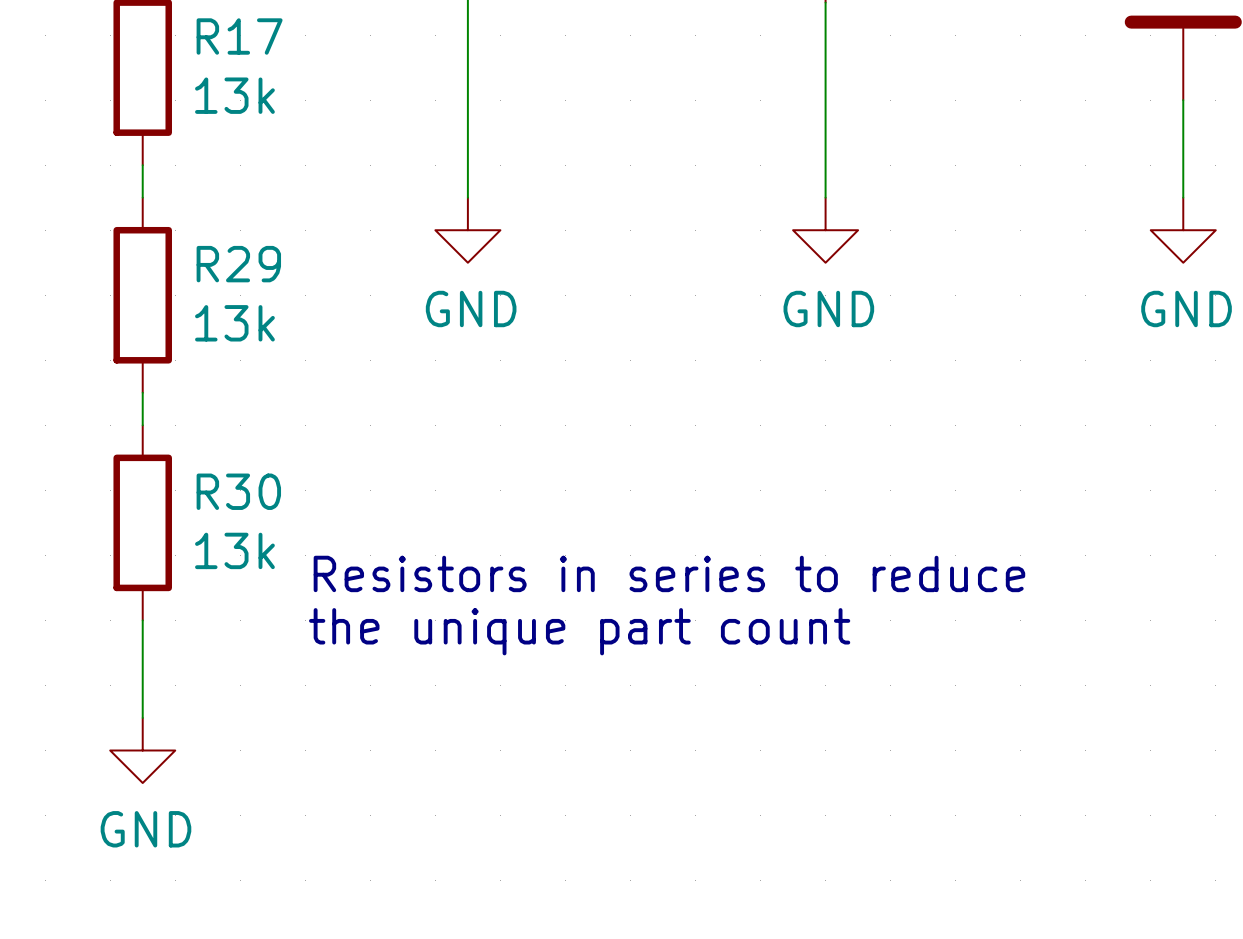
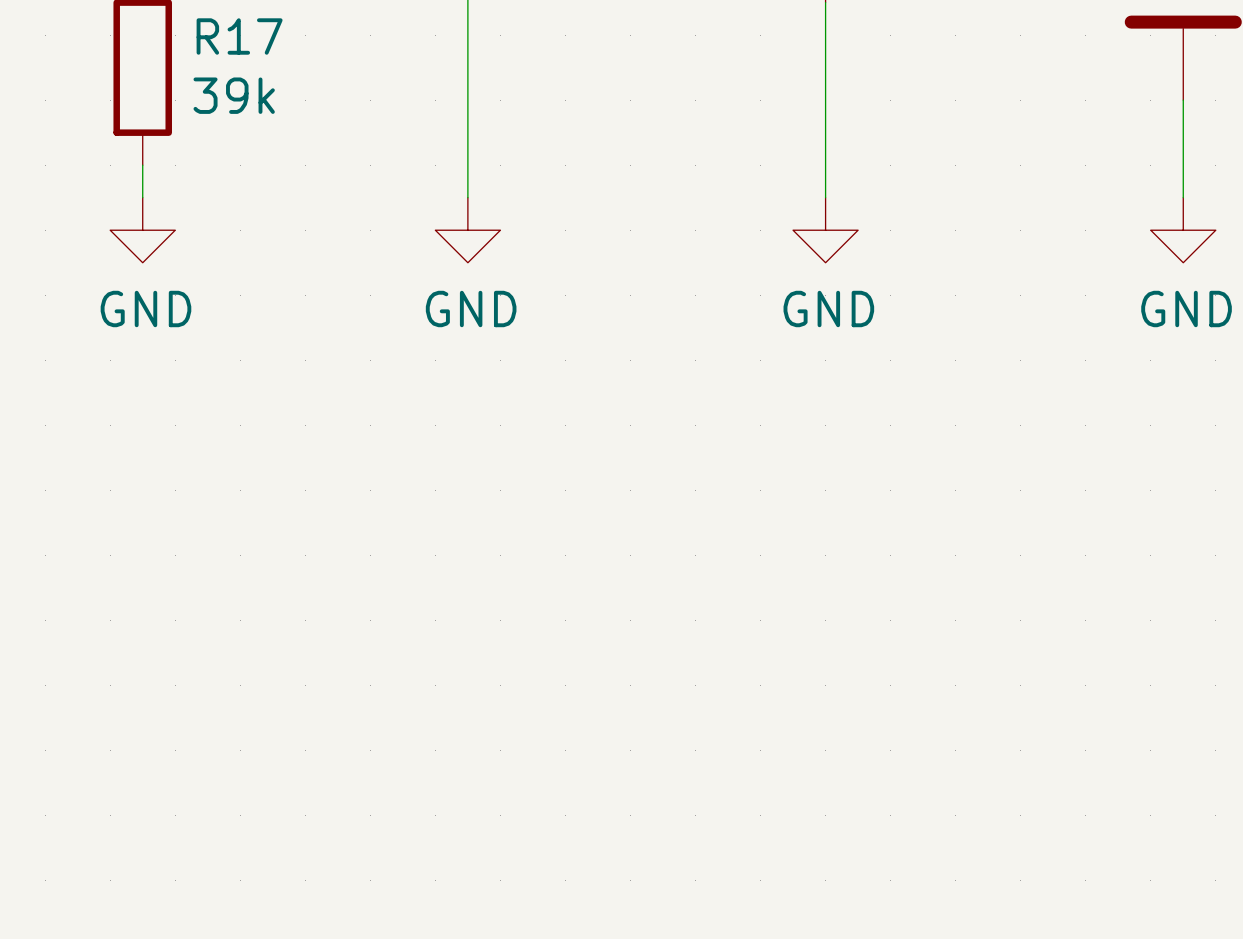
R17 value: 13k (234, 95) -> 39k (234, 95)
R29: 13k (142, 295) -> none
wire: (142, 392) (142, 425) -> none
R30: 13k (142, 522) -> none
text: Resistors in series to reduce (669, 573) -> none
wire: (142, 620) (142, 717) -> none
text: the unique part count (579, 631) -> none
power symbol position: GND (142, 750) -> GND (142, 230)

